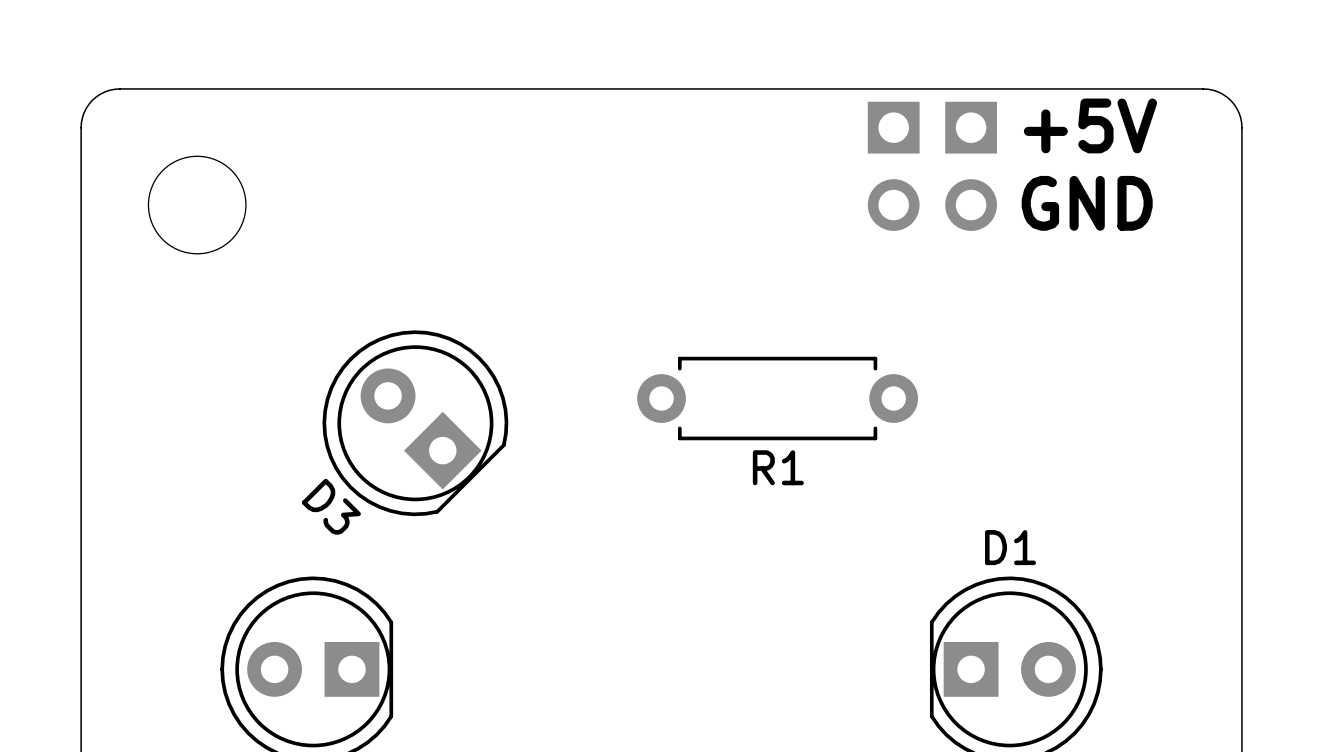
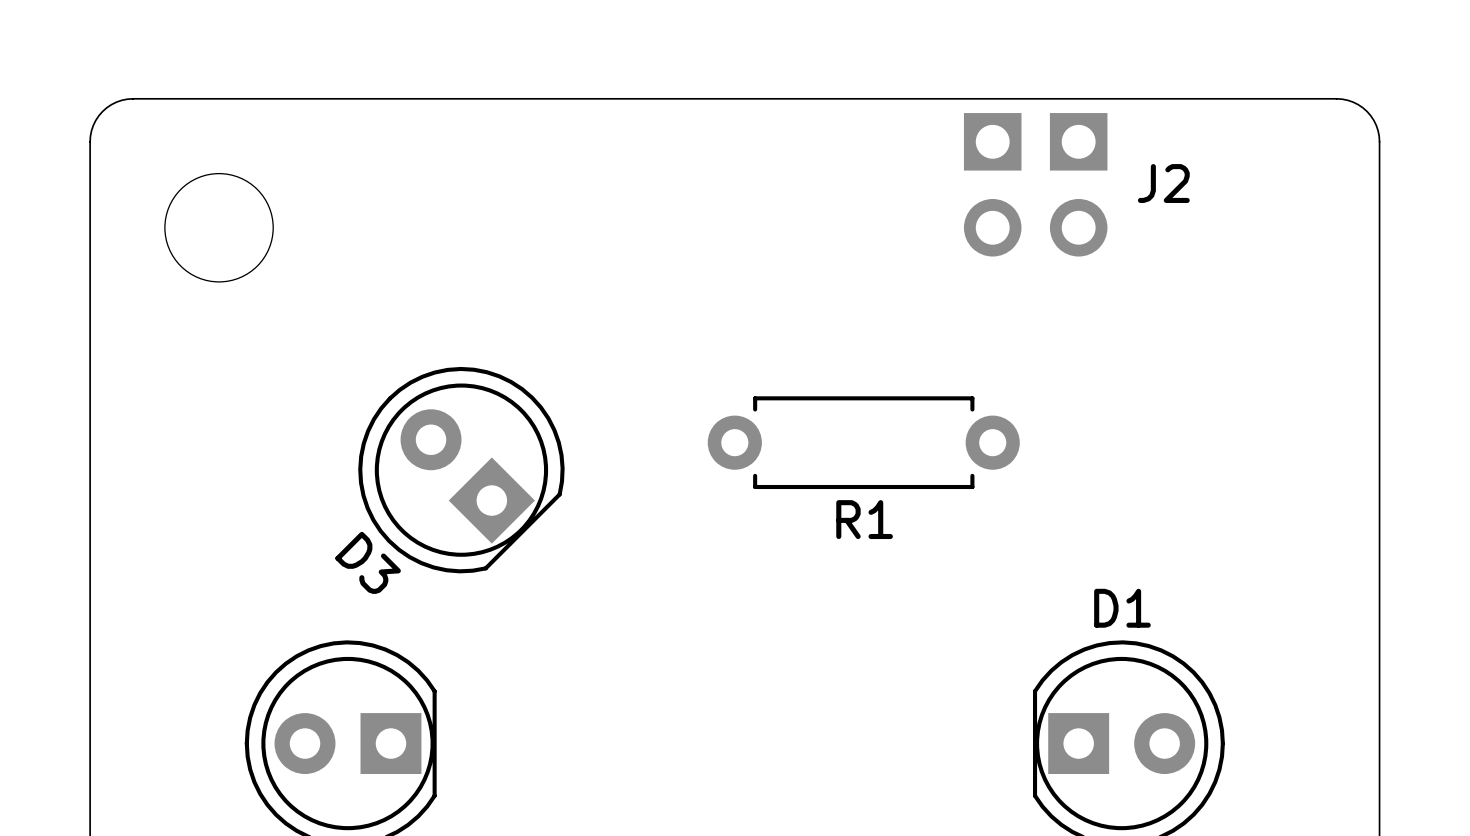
text: +5V (1090, 125) -> none
J2 name: none -> J2 (1163, 183)
text: GND (1087, 203) -> none

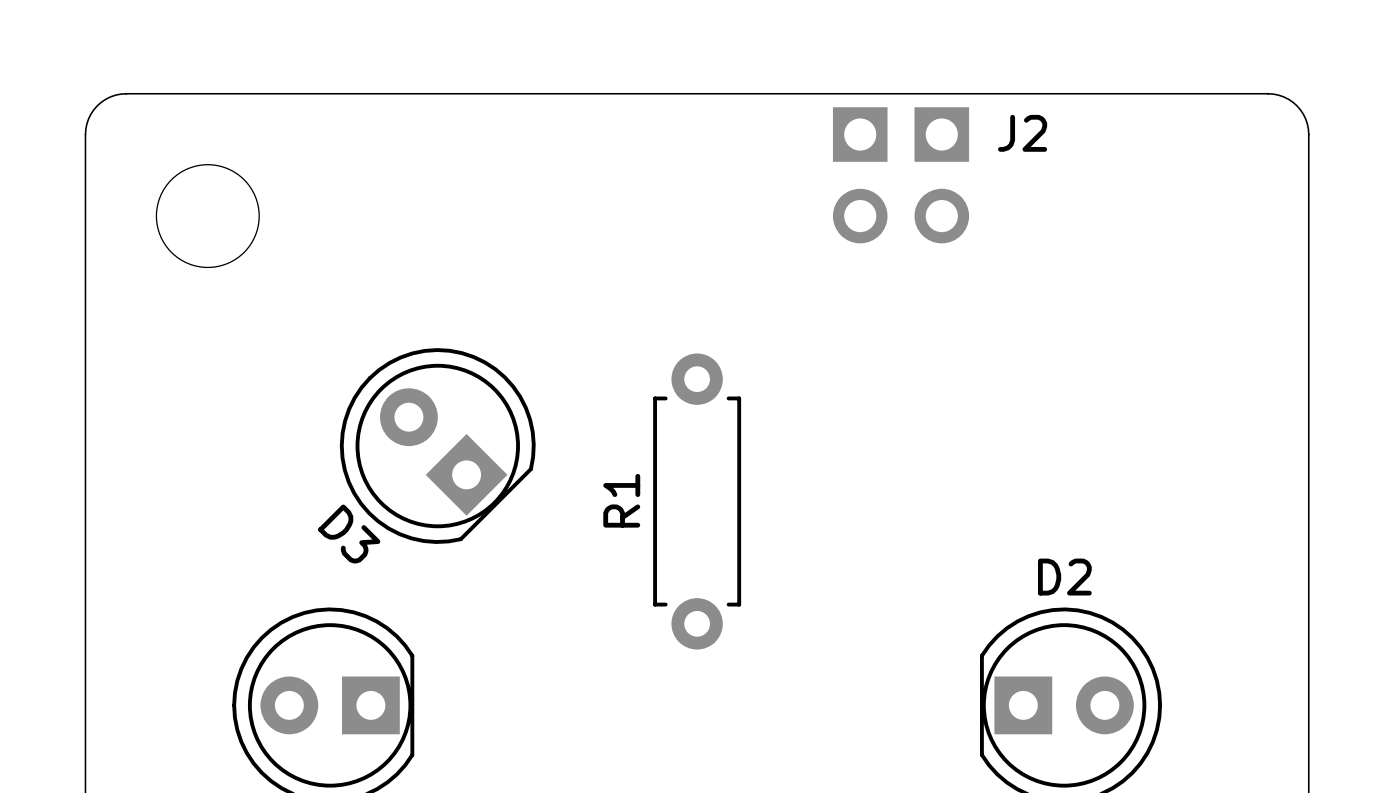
J2 name position: J2 (1163, 183) -> J2 (1022, 133)
J2 position: (1078, 184) -> (860, 175)
R1 rotation: 0° (863, 442) -> 90° clockwise (697, 501)
D1 name: D1 (1122, 608) -> D2 (1064, 577)

